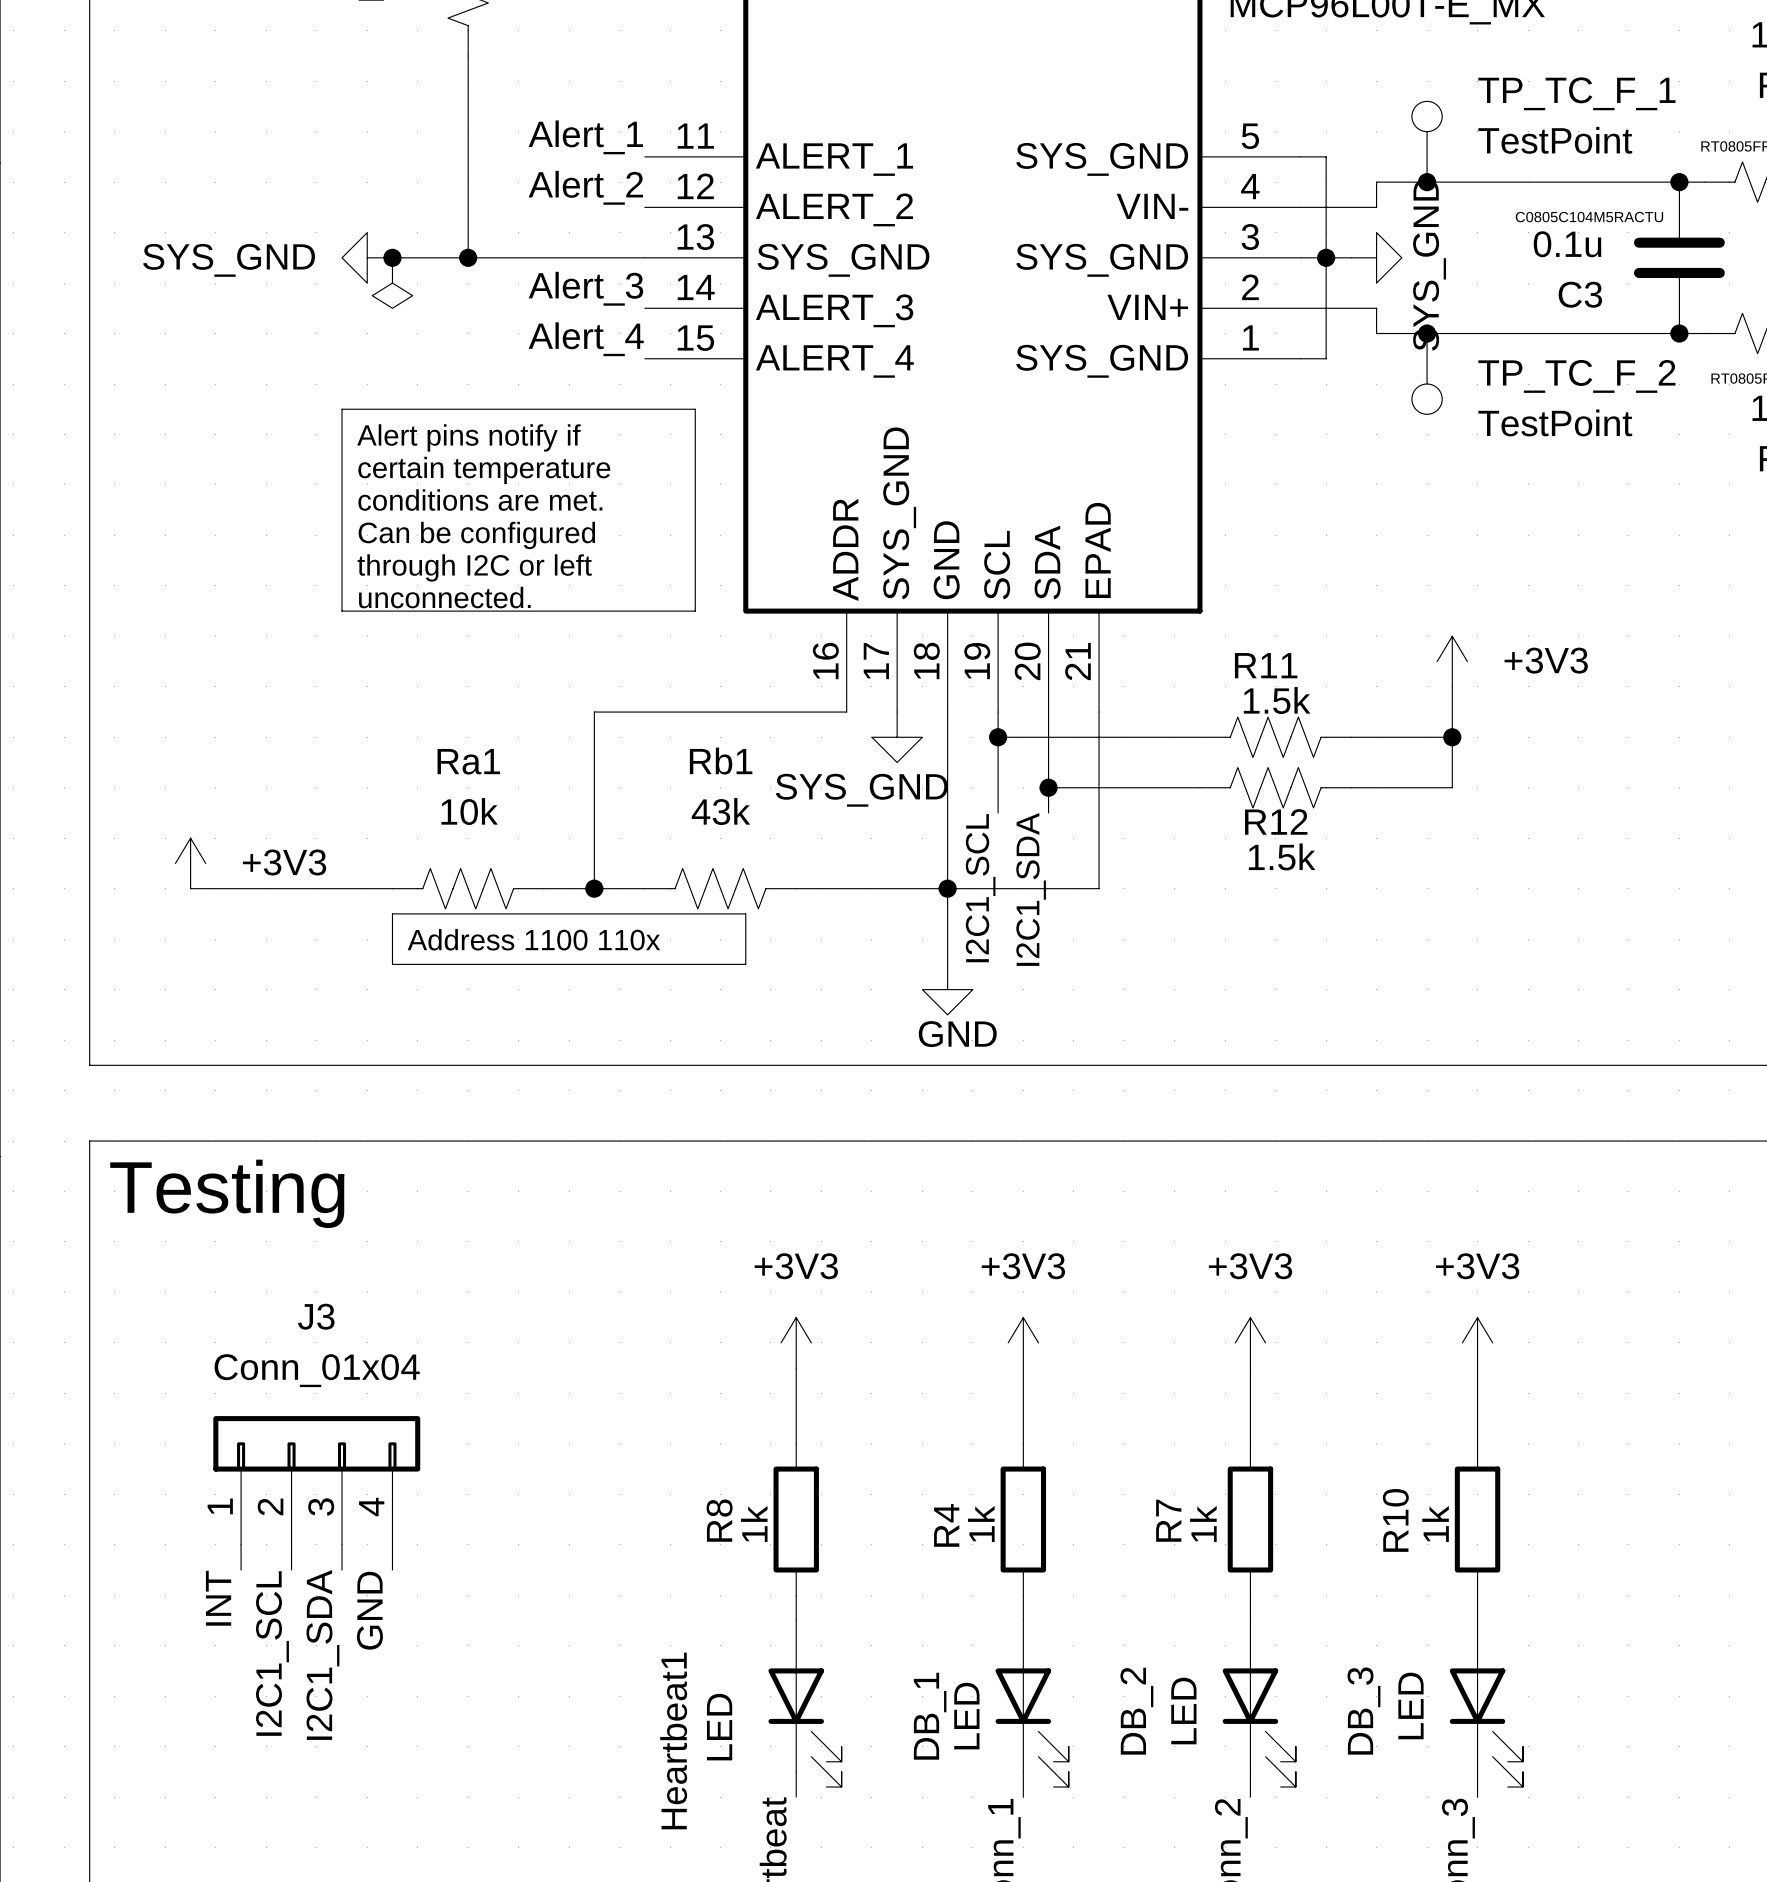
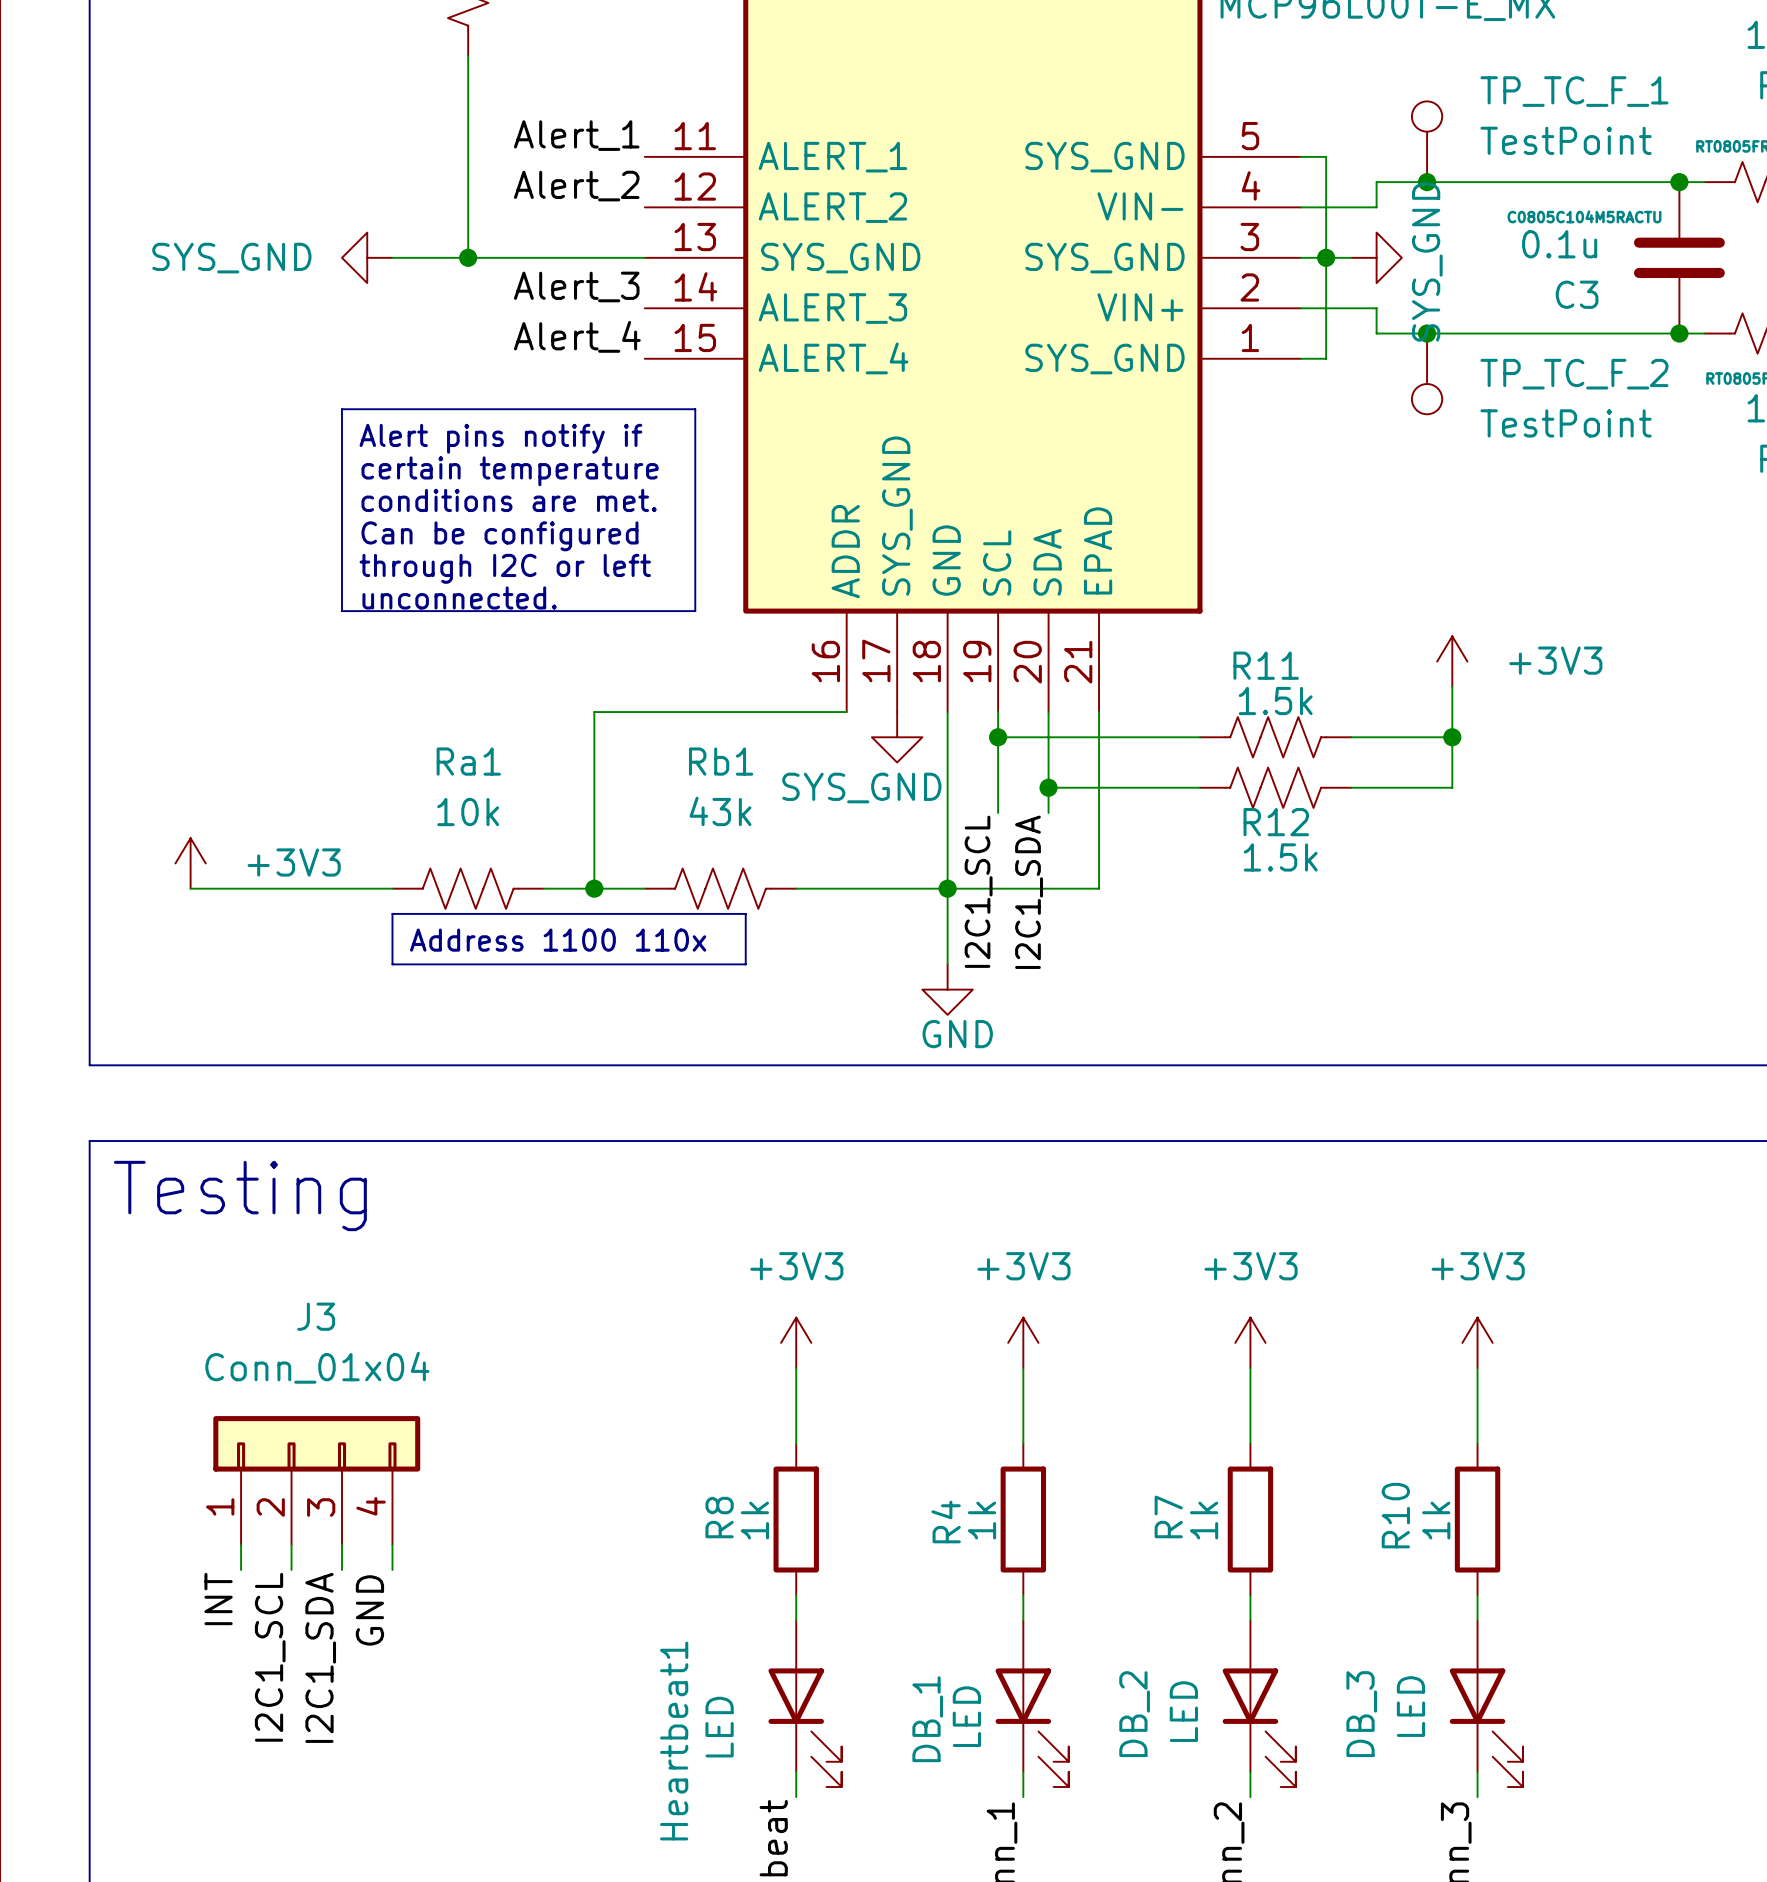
junction: (392, 257) -> none
power symbol: (392, 283) -> none

